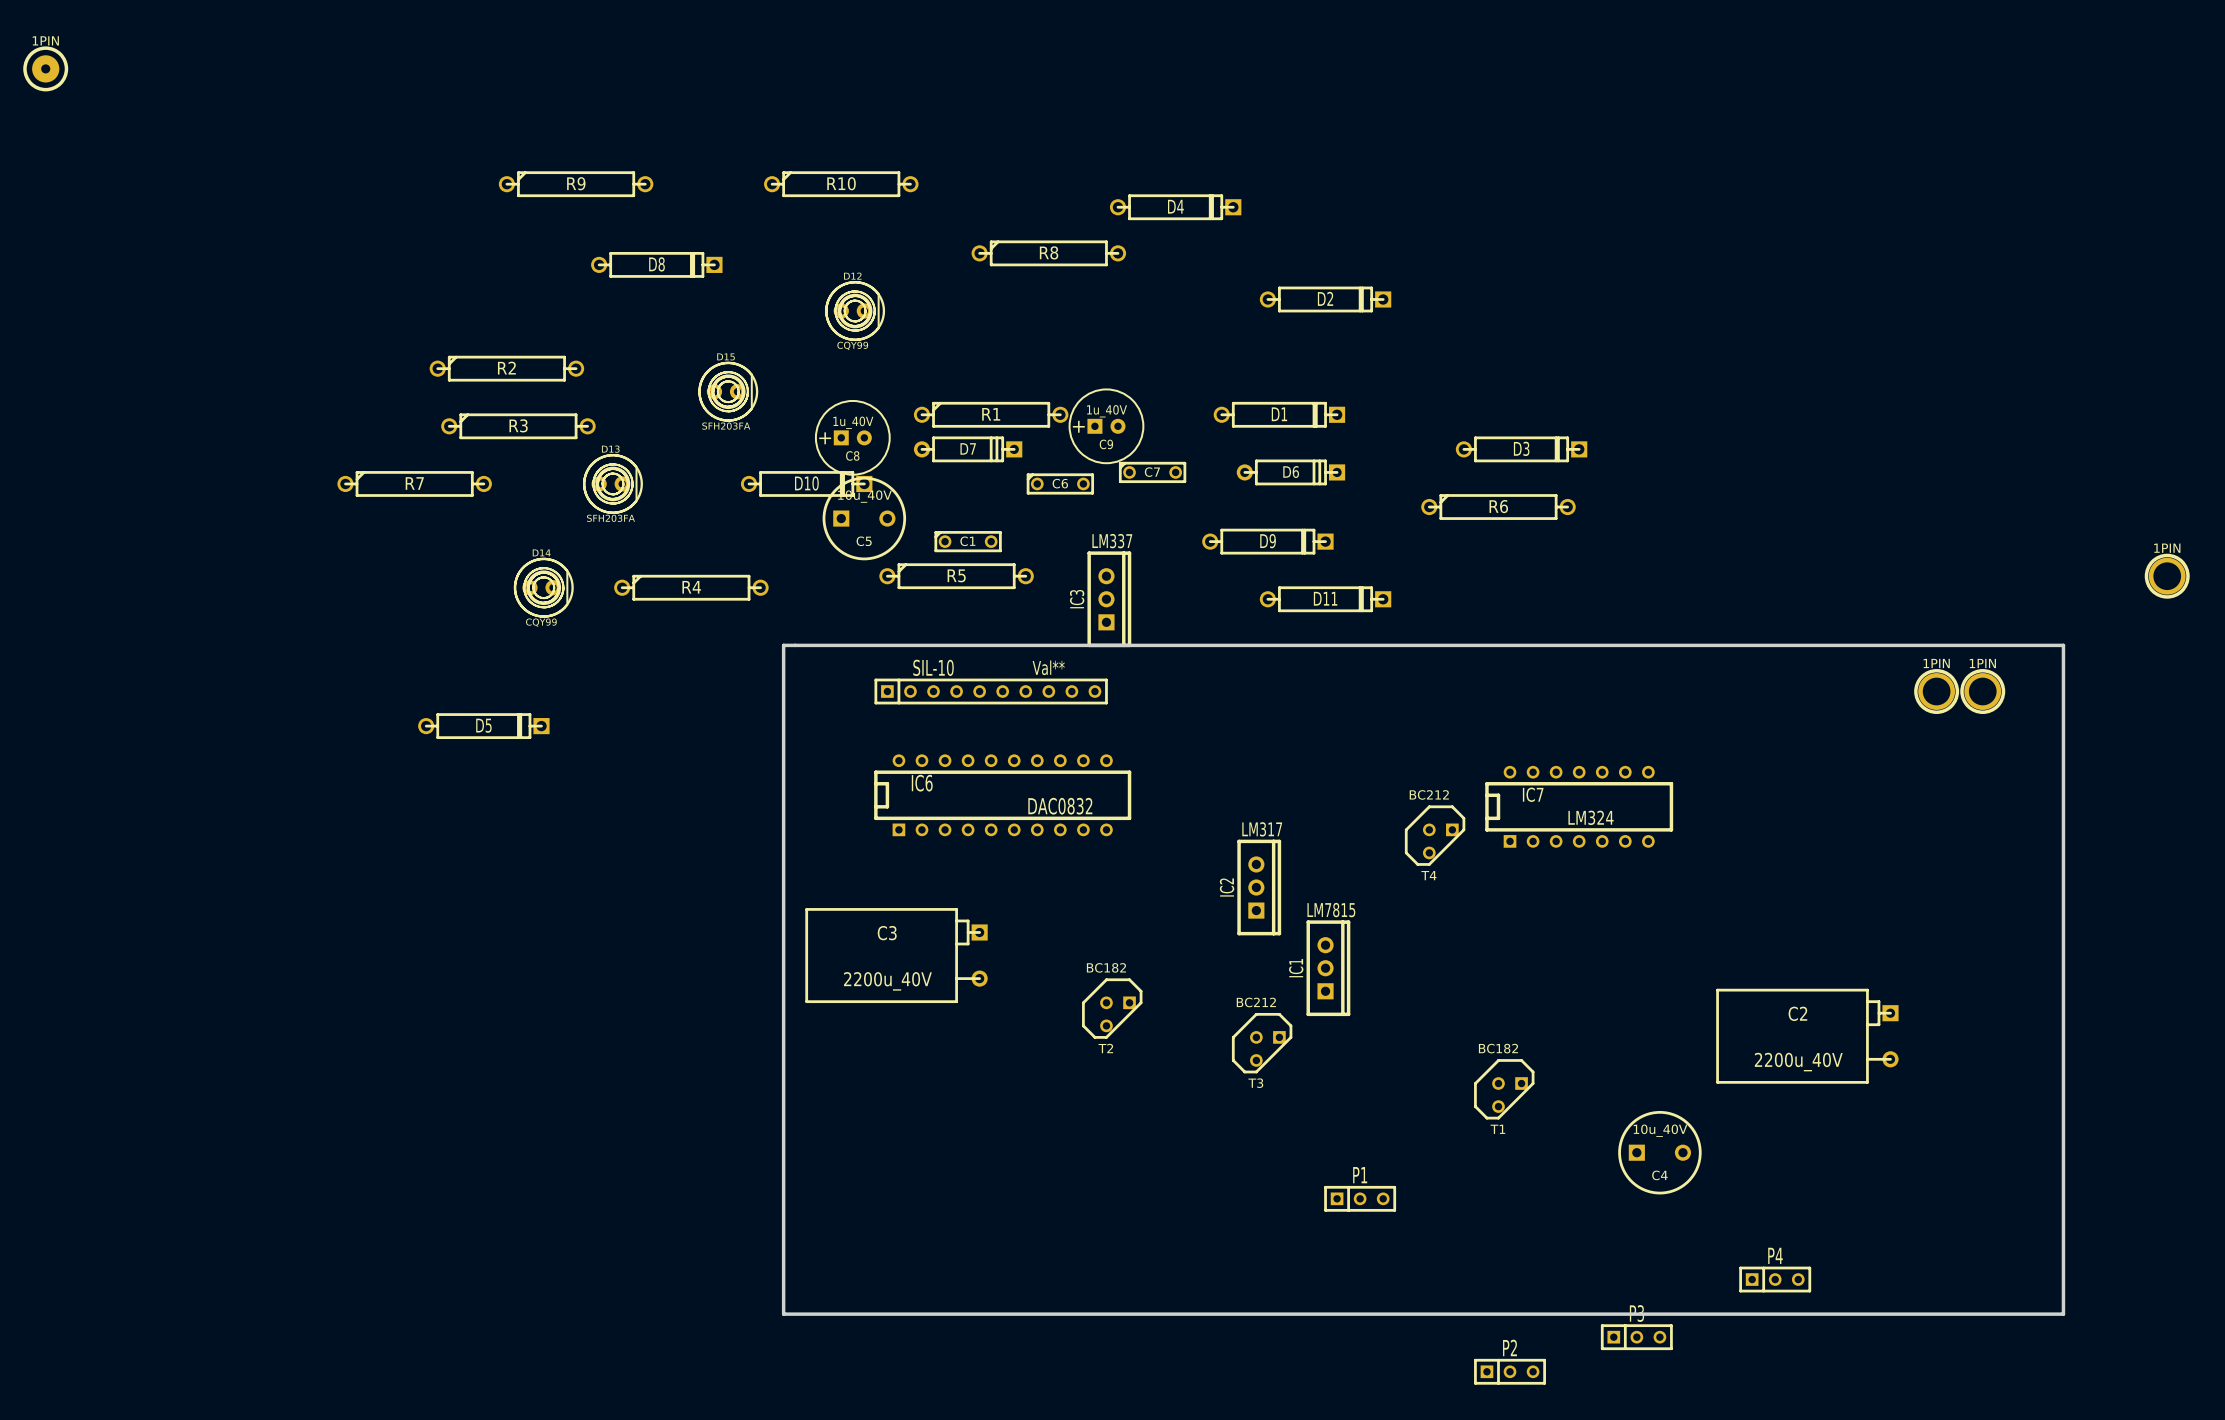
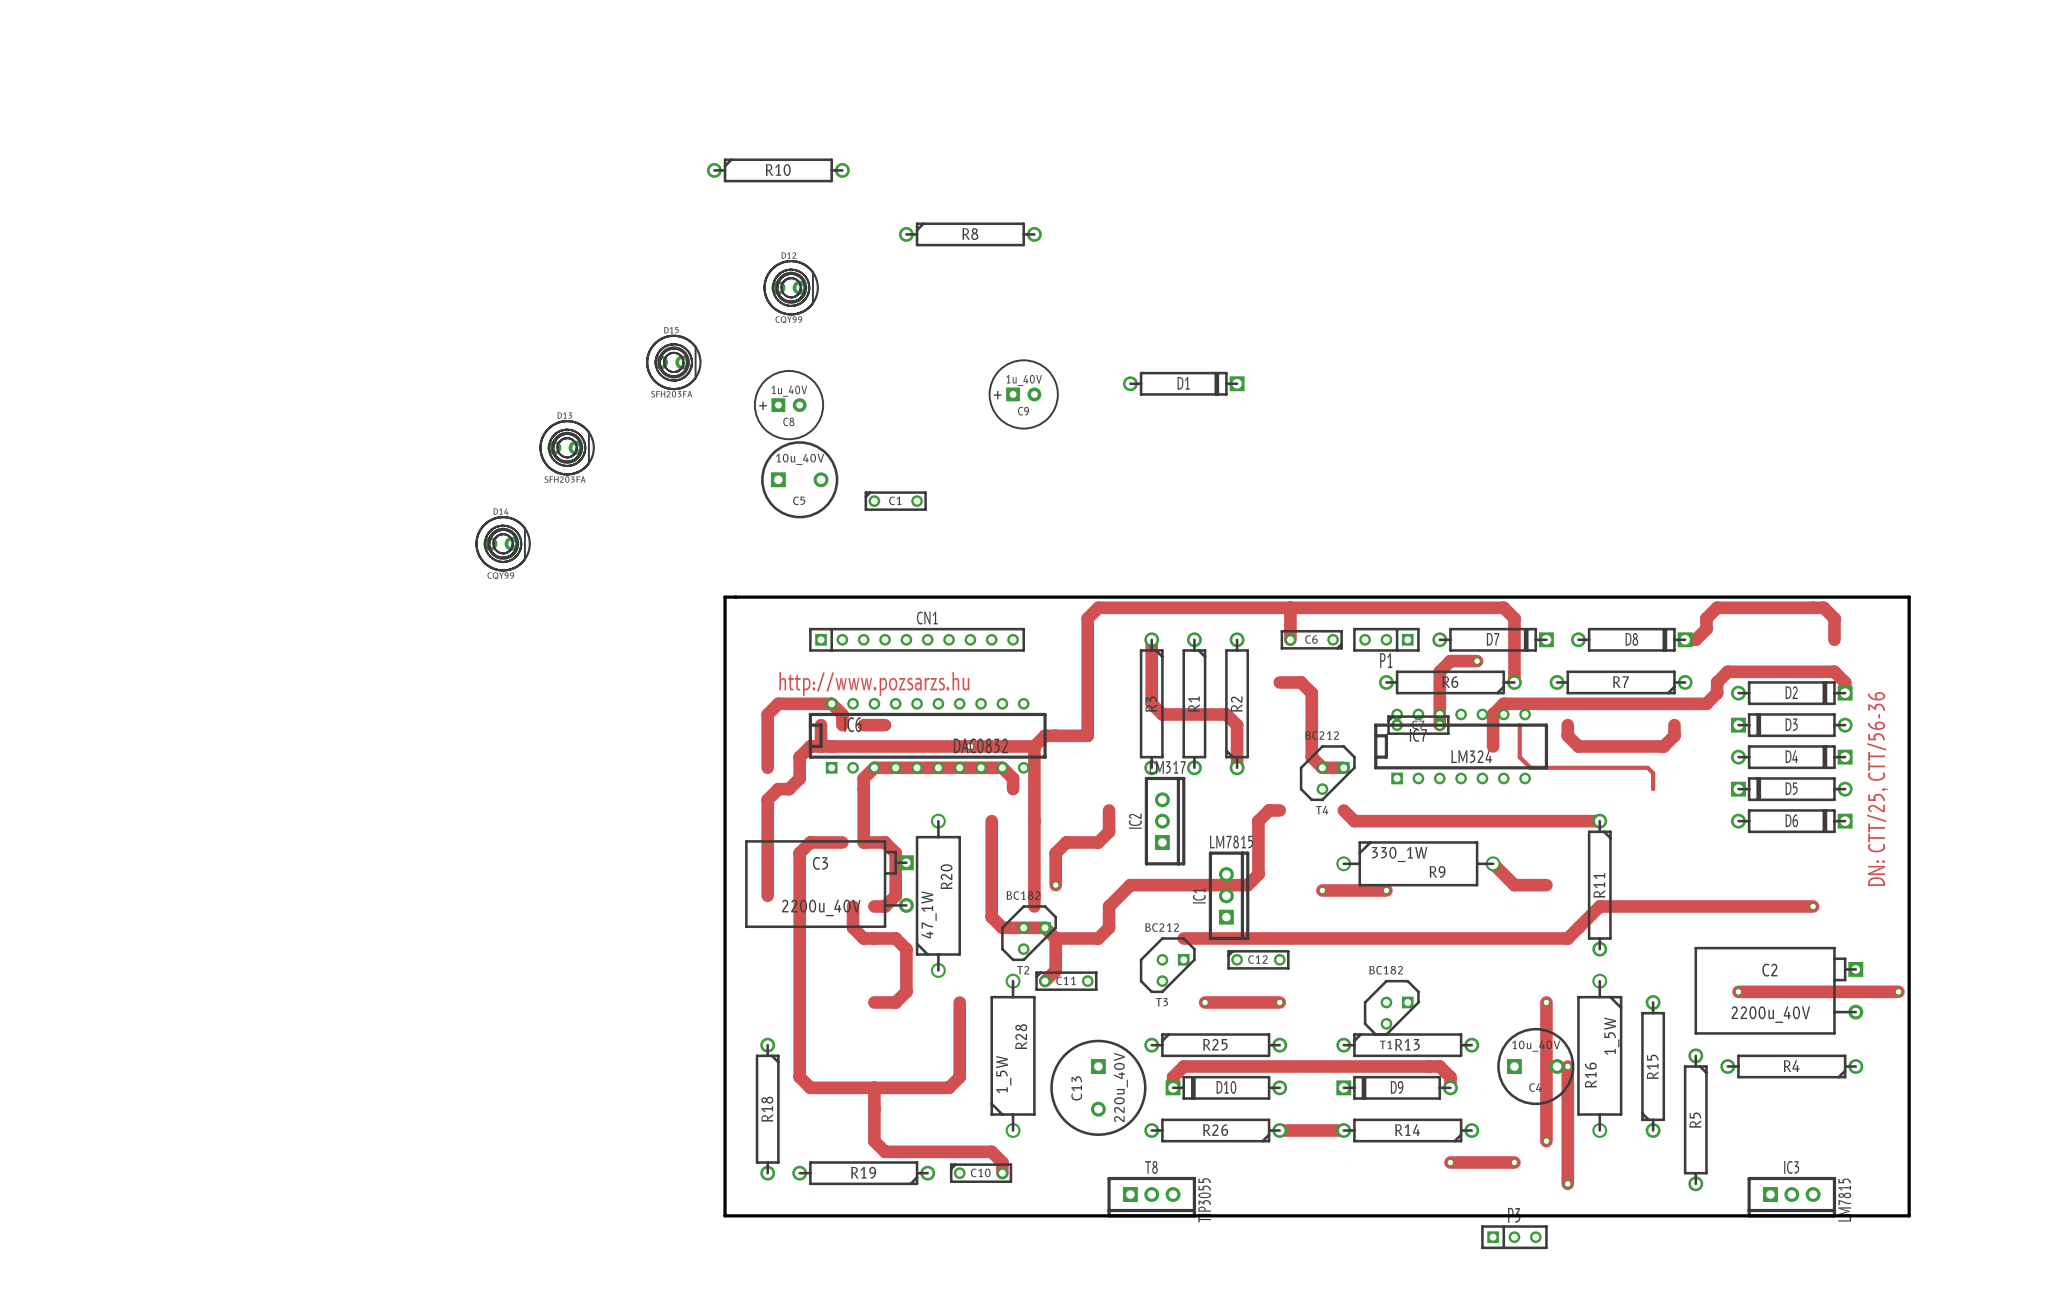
1PIN: (45, 68) -> none
R9 footprint: [498, 171, 654, 198] -> [1336, 841, 1501, 887]
R9 name position: R9 (576, 183) -> R9 (1437, 871)
D4 position: (1175, 207) -> (1791, 757)
D8 position: (656, 264) -> (1631, 639)
D2 position: (1325, 299) -> (1791, 693)
R2 rotation: 0° (506, 368) -> 90° counterclockwise (1237, 703)
R2 position: (506, 368) -> (1237, 703)
R1 rotation: 0° (991, 414) -> 90° clockwise (1194, 703)
R1 position: (991, 414) -> (1194, 703)
R3 rotation: 0° (518, 426) -> 90° clockwise (1151, 703)
R3 position: (518, 426) -> (1151, 703)
D7 footprint: [913, 436, 1023, 463] -> [1432, 627, 1554, 652]
D3 rotation: 0° (1521, 449) -> 180° (1791, 725)
D3 position: (1521, 449) -> (1791, 725)
D6 footprint: [1236, 459, 1346, 486] -> [1730, 809, 1853, 834]
C7 position: (1152, 472) -> (1418, 725)
R7 rotation: 0° (414, 483) -> 180° (1621, 682)
R7 position: (414, 483) -> (1621, 682)
D10 rotation: 0° (806, 483) -> 180° (1226, 1087)
D10 position: (806, 483) -> (1226, 1087)
C6 rotation: 0° (1060, 483) -> 180° (1311, 639)
C6 position: (1060, 483) -> (1311, 639)
R6 rotation: 0° (1498, 507) -> 180° (1450, 682)
R6 position: (1498, 507) -> (1450, 682)
IC3 value: LM337 (1112, 541) -> LM7815 (1844, 1200)
D9 rotation: 0° (1267, 541) -> 180° (1397, 1087)
D9 position: (1267, 541) -> (1397, 1087)
R5 rotation: 0° (956, 576) -> 90° clockwise (1695, 1119)
R5 position: (956, 576) -> (1695, 1119)
1PIN: (2167, 576) -> none
R4 rotation: 0° (691, 587) -> 180° (1791, 1066)
R4 position: (691, 587) -> (1791, 1066)
IC3 rotation: 0° (1109, 599) -> 90° clockwise (1791, 1197)
IC3 position: (1109, 599) -> (1791, 1197)
D11: (1325, 599) -> none
track: none -> (1290, 607) (1290, 639)
SIL-10 name: SIL-10 (933, 667) -> none
SIL-10 value: Val** (1048, 667) -> CN1 (927, 618)
track: none -> (1151, 639) (1151, 703) (1162, 714) (1226, 714) (1237, 725) (1237, 767)
track: none -> (1685, 639) (1695, 639) (1706, 629) (1706, 618) (1717, 607) (1823, 607) (1834, 618) (1834, 639)
1PIN: (1936, 691) -> none
1PIN: (1982, 691) -> none
track: none -> (1477, 661) (1450, 661) (1439, 671) (1439, 725)
via: none -> (1477, 661)
D5 rotation: 0° (483, 726) -> 180° (1791, 789)
D5 position: (483, 726) -> (1791, 789)
track: none -> (1279, 682) (1301, 682) (1311, 693) (1311, 757) (1322, 767) (1343, 767)
track: none -> (1514, 682) (1514, 618) (1503, 607) (1098, 607) (1087, 618) (1087, 735) (1045, 735) (1034, 746)
text: none -> http://www.pozsarzs.hu (874, 684)
track: none -> (1845, 693) (1845, 682) (1834, 671) (1727, 671) (1717, 682) (1717, 693) (1706, 703) (1503, 703) (1493, 714) (1493, 746)
track: none -> (821, 725) (821, 746)
track: none -> (842, 725) (842, 714) (831, 703) (778, 703) (767, 714) (767, 767)
track: none -> (863, 725) (885, 725)
track: none -> (1519, 725) (1519, 757) (1530, 767) (1647, 767) (1653, 773) (1653, 789)
track: none -> (1567, 725) (1567, 735) (1578, 746) (1663, 746) (1674, 735) (1674, 725)
via: none -> (970, 746)
track: none -> (1034, 746) (810, 746) (799, 757) (799, 778) (789, 789) (778, 789) (767, 799) (767, 895)
track: none -> (1034, 746) (1034, 906)
track: none -> (1013, 789) (1013, 778) (1002, 767) (874, 767) (863, 778) (863, 842) (885, 842) (895, 853) (895, 895) (885, 906) (874, 906)
text: none -> DN: CTT/25, CTT/56-36 (1877, 789)
track: none -> (1109, 810) (1109, 831) (1098, 842) (1066, 842) (1055, 853) (1055, 885)
track: none -> (1279, 810) (1269, 810) (1258, 821) (1258, 874) (1247, 885) (1130, 885) (1109, 906) (1109, 927) (1098, 938) (1055, 938)
track: none -> (1343, 810) (1354, 821) (1599, 821)
track: none -> (991, 821) (991, 917) (1002, 927) (1045, 927) (1055, 938)
track: none -> (842, 842) (810, 842) (799, 853) (799, 1077) (810, 1087) (949, 1087) (959, 1077) (959, 1002)
R9 value: none -> 330_1W (1399, 854)
track: none -> (1493, 863) (1514, 885) (1546, 885)
via: none -> (1055, 885)
R11: none -> (1599, 885)
track: none -> (1322, 890) (1386, 890)
via: none -> (1322, 890)
via: none -> (1386, 890)
R20: none -> 47_1W (938, 895)
track: none -> (853, 906) (853, 927) (863, 938) (895, 938) (906, 949) (906, 991) (895, 1002) (874, 1002)
track: none -> (1813, 906) (1599, 906) (1567, 938) (1183, 938)
via: none -> (1813, 906)
track: none -> (1055, 938) (1055, 970) (1045, 981)
C2 position: (1807, 1036) -> (1778, 990)
C12: none -> (1258, 959)
C11: none -> (1066, 981)
track: none -> (1738, 991) (1898, 991)
via: none -> (1738, 991)
via: none -> (1898, 991)
track: none -> (1205, 1002) (1279, 1002)
via: none -> (1205, 1002)
via: none -> (1279, 1002)
track: none -> (1546, 1002) (1546, 1141)
via: none -> (1546, 1002)
R25: none -> (1215, 1045)
R13: none -> (1407, 1045)
R28: none -> 1_5W (1013, 1055)
R16: none -> 1_5W (1599, 1055)
track: none -> (1567, 1066) (1567, 1183)
via: none -> (1567, 1066)
R15: none -> (1653, 1066)
track: none -> (874, 1087) (874, 1141) (885, 1151) (991, 1151) (1002, 1162) (1002, 1173)
C13: none -> 220u_40V (1098, 1087)
track: none -> (1173, 1087) (1173, 1077) (1183, 1066) (1439, 1066) (1450, 1077) (1450, 1087)
R18: none -> (767, 1109)
P1 rotation: 0° (1360, 1198) -> 180° (1386, 639)
P1 position: (1360, 1198) -> (1386, 639)
R26: none -> (1215, 1130)
track: none -> (1279, 1130) (1343, 1130)
R14: none -> (1407, 1130)
via: none -> (1546, 1141)
track: none -> (1450, 1162) (1514, 1162)
via: none -> (1450, 1162)
via: none -> (1514, 1162)
R19: none -> (863, 1173)
C10: none -> (981, 1173)
via: none -> (1567, 1183)
P4: (1775, 1279) -> none
T8: none -> TIP3055 (1151, 1197)
P2: (1510, 1371) -> none

